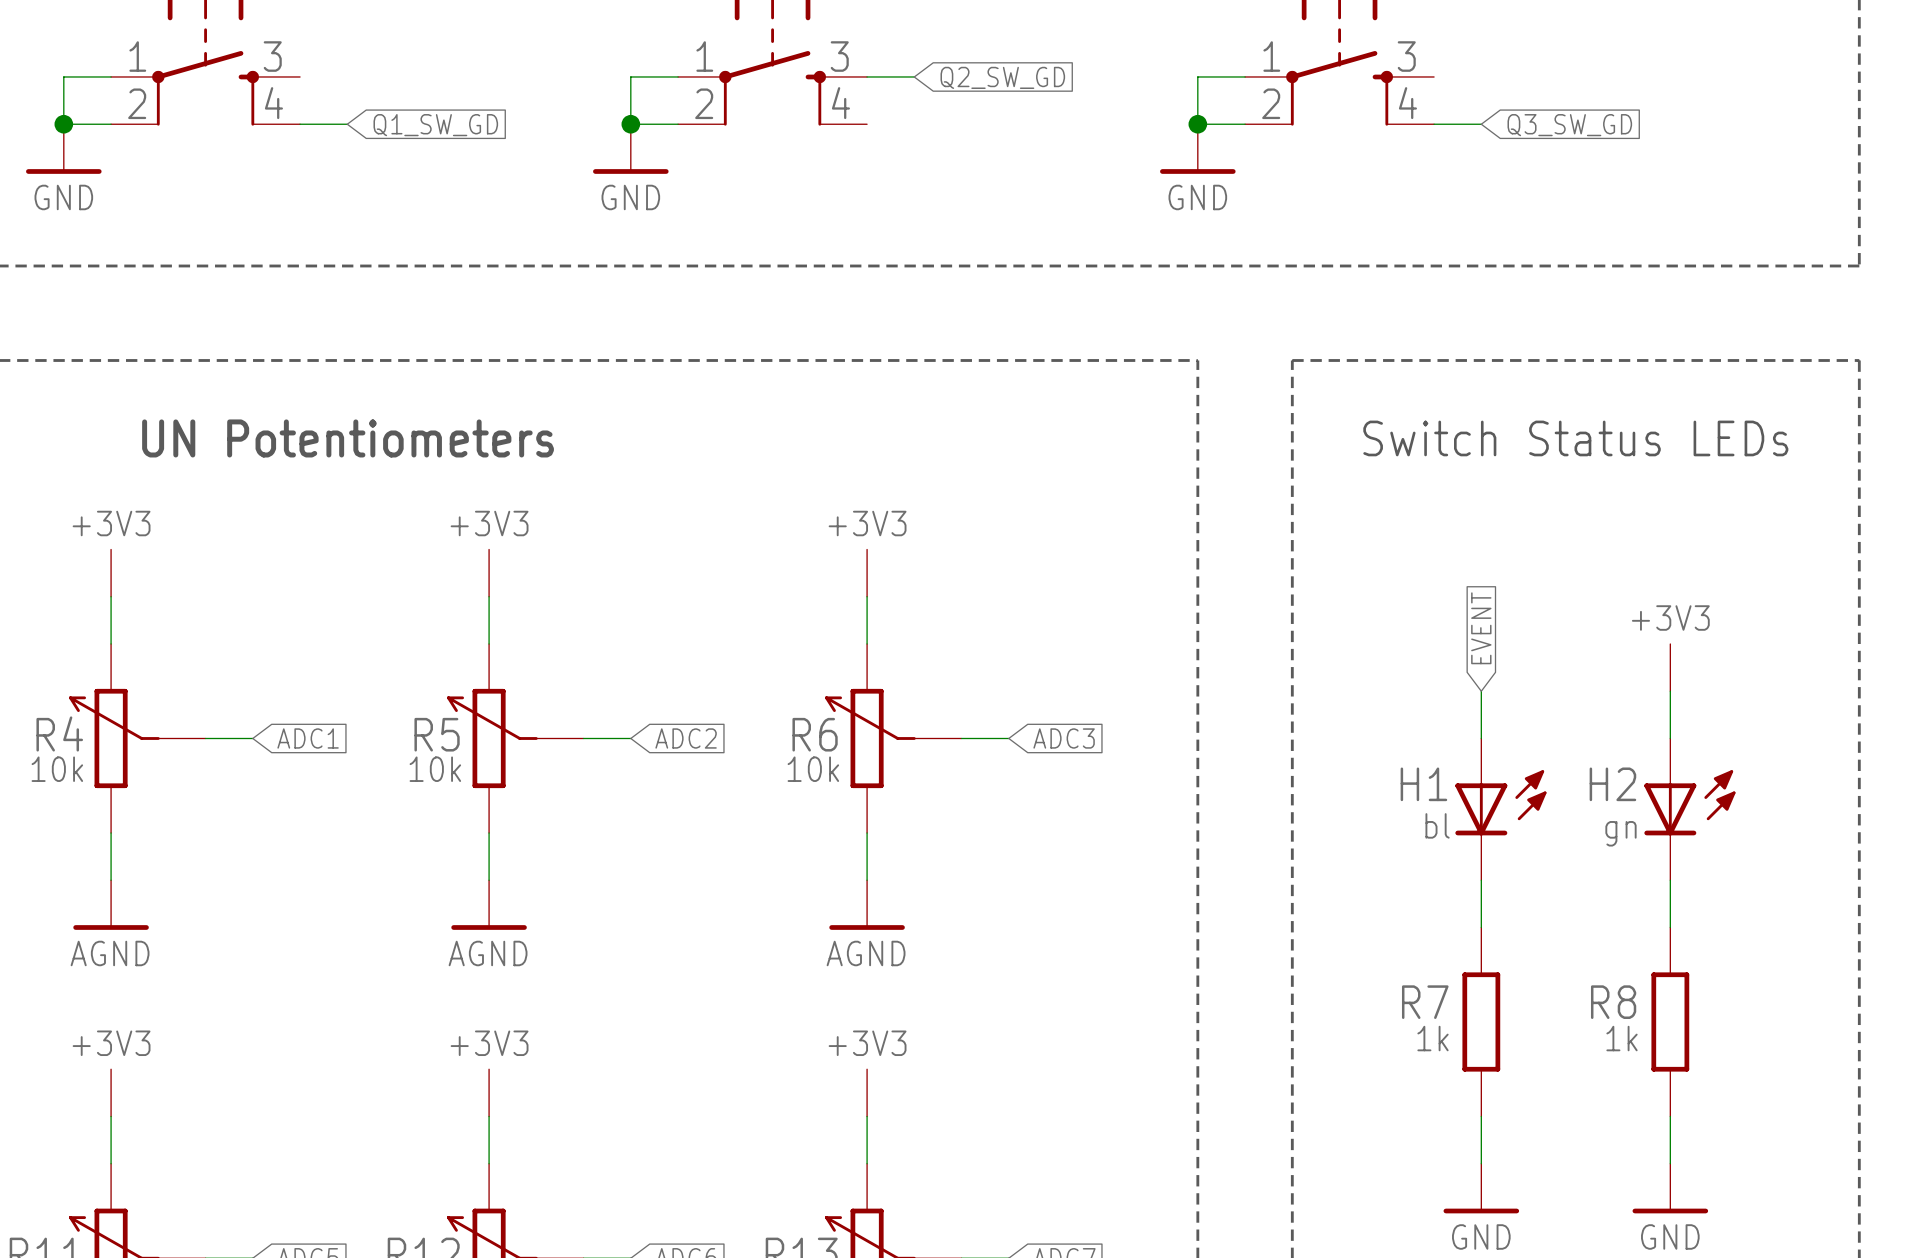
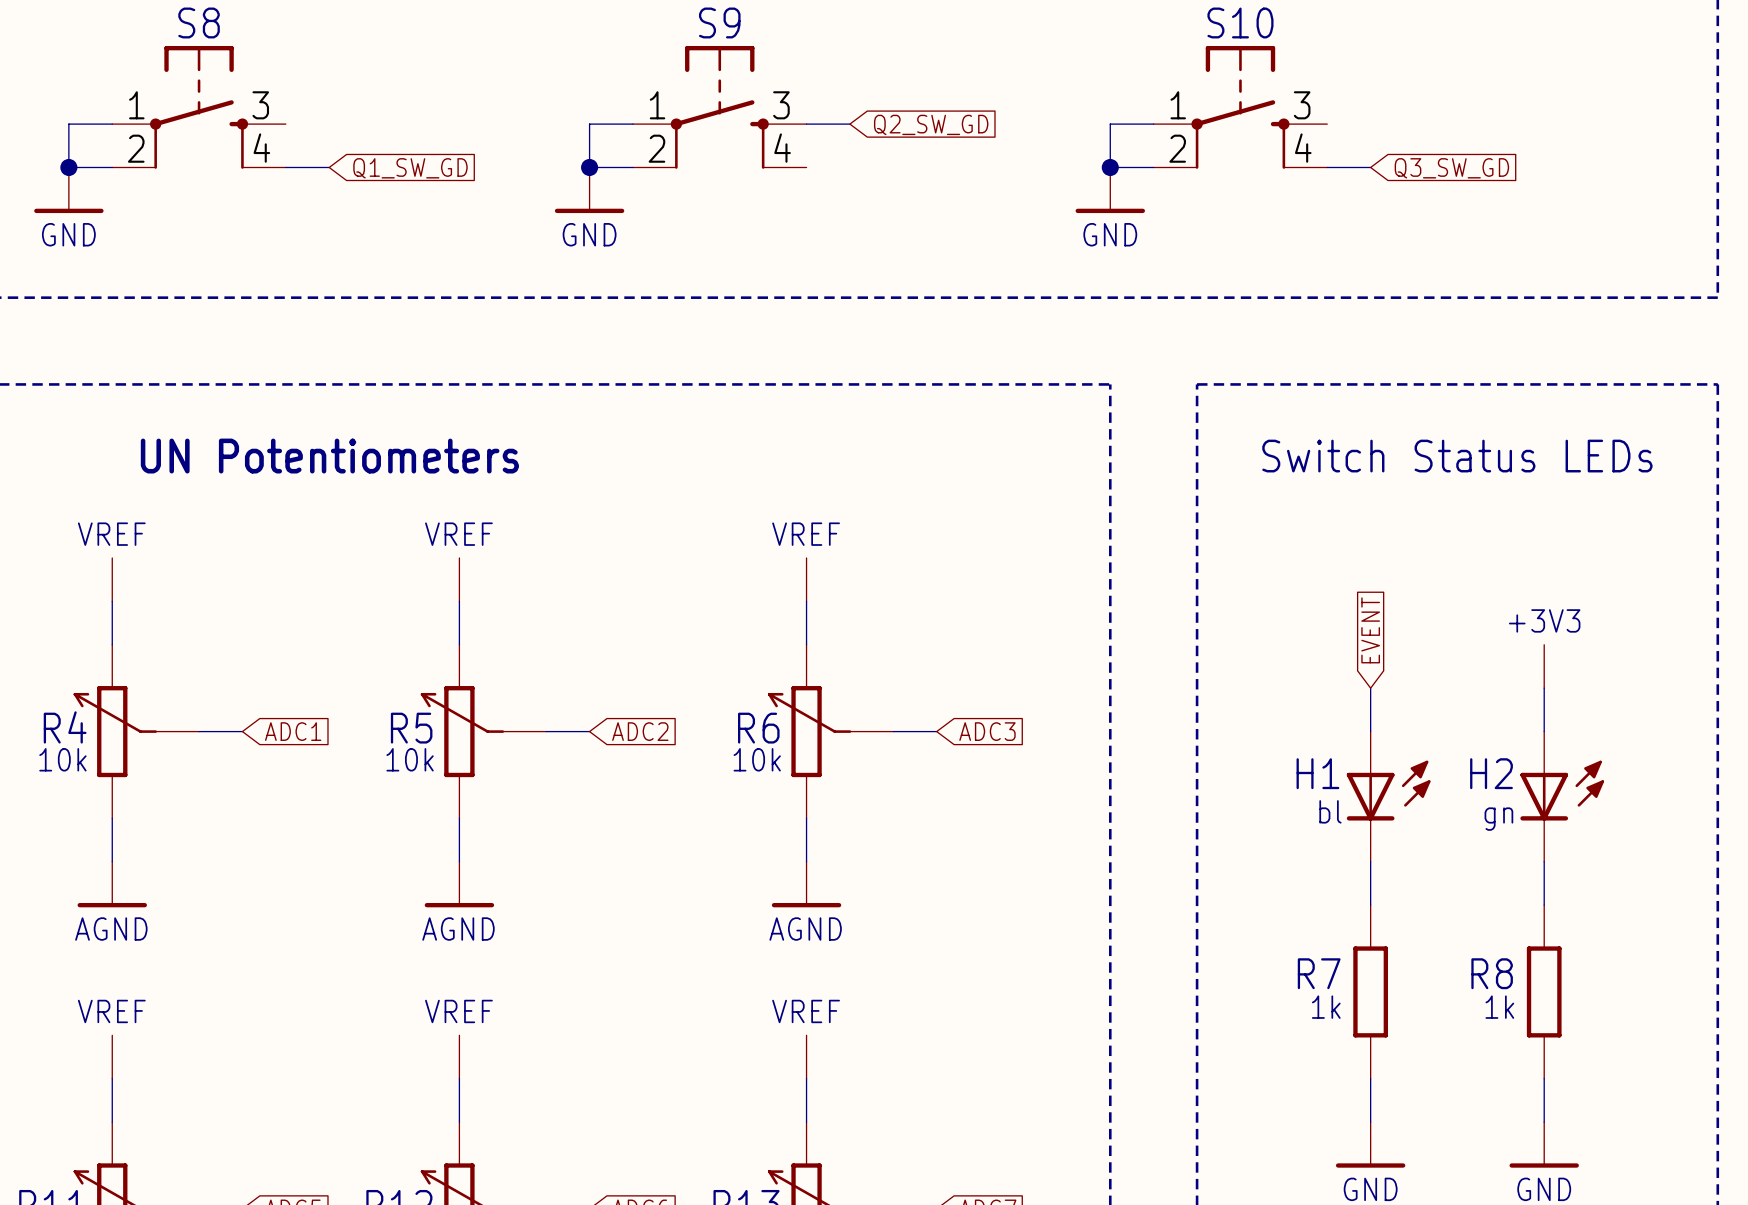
power symbol: +3V3 (111, 573) -> VREF (112, 579)
power symbol: +3V3 (489, 573) -> VREF (459, 579)
power symbol: +3V3 (867, 573) -> VREF (806, 579)
power symbol: +3V3 (111, 1092) -> VREF (112, 1057)
power symbol: +3V3 (489, 1092) -> VREF (459, 1057)
power symbol: +3V3 (867, 1092) -> VREF (806, 1057)

